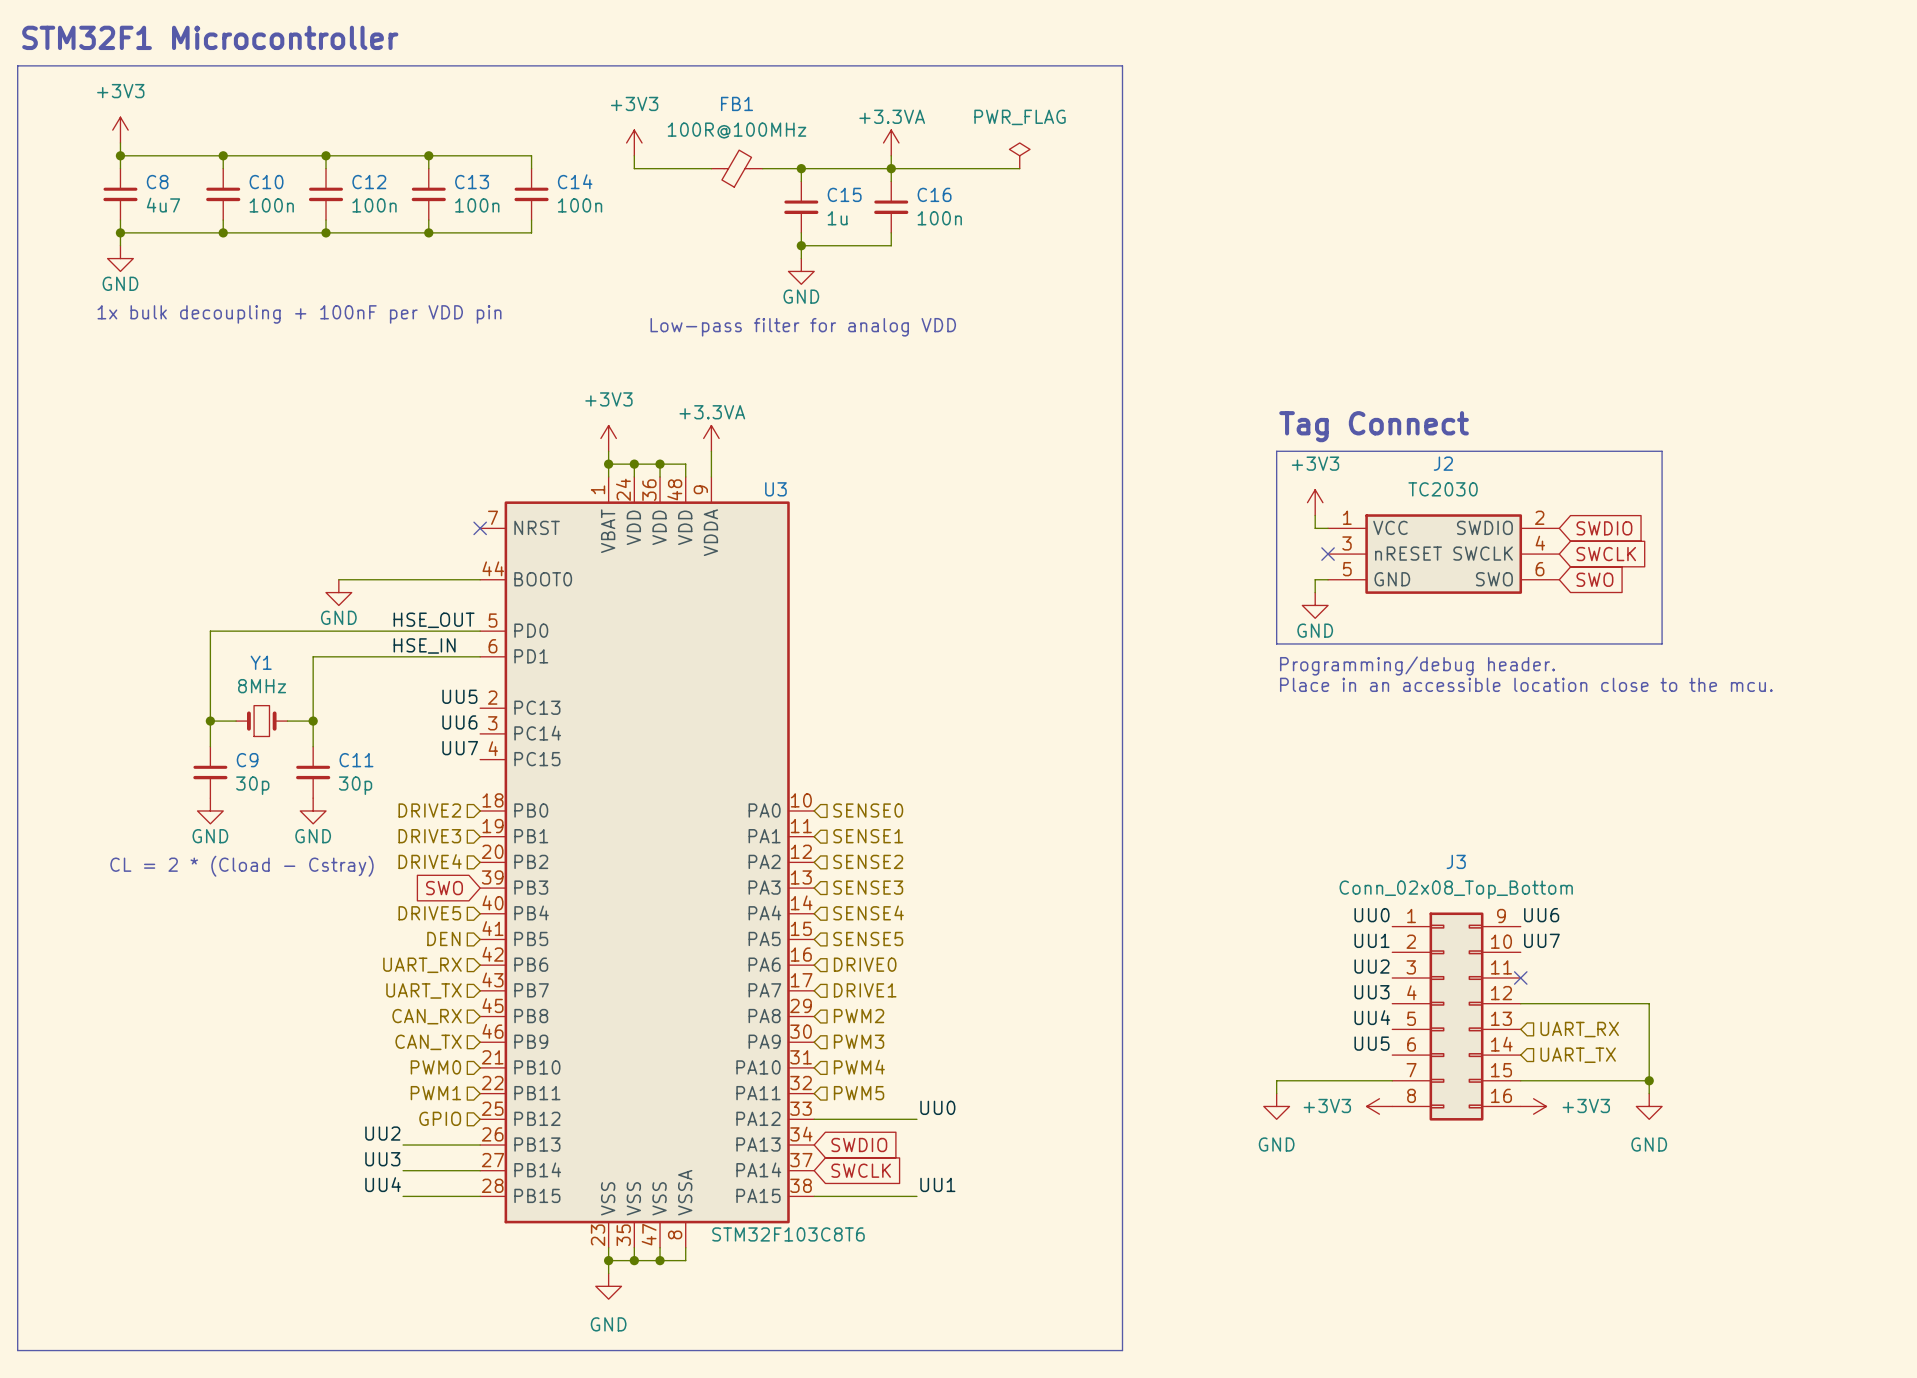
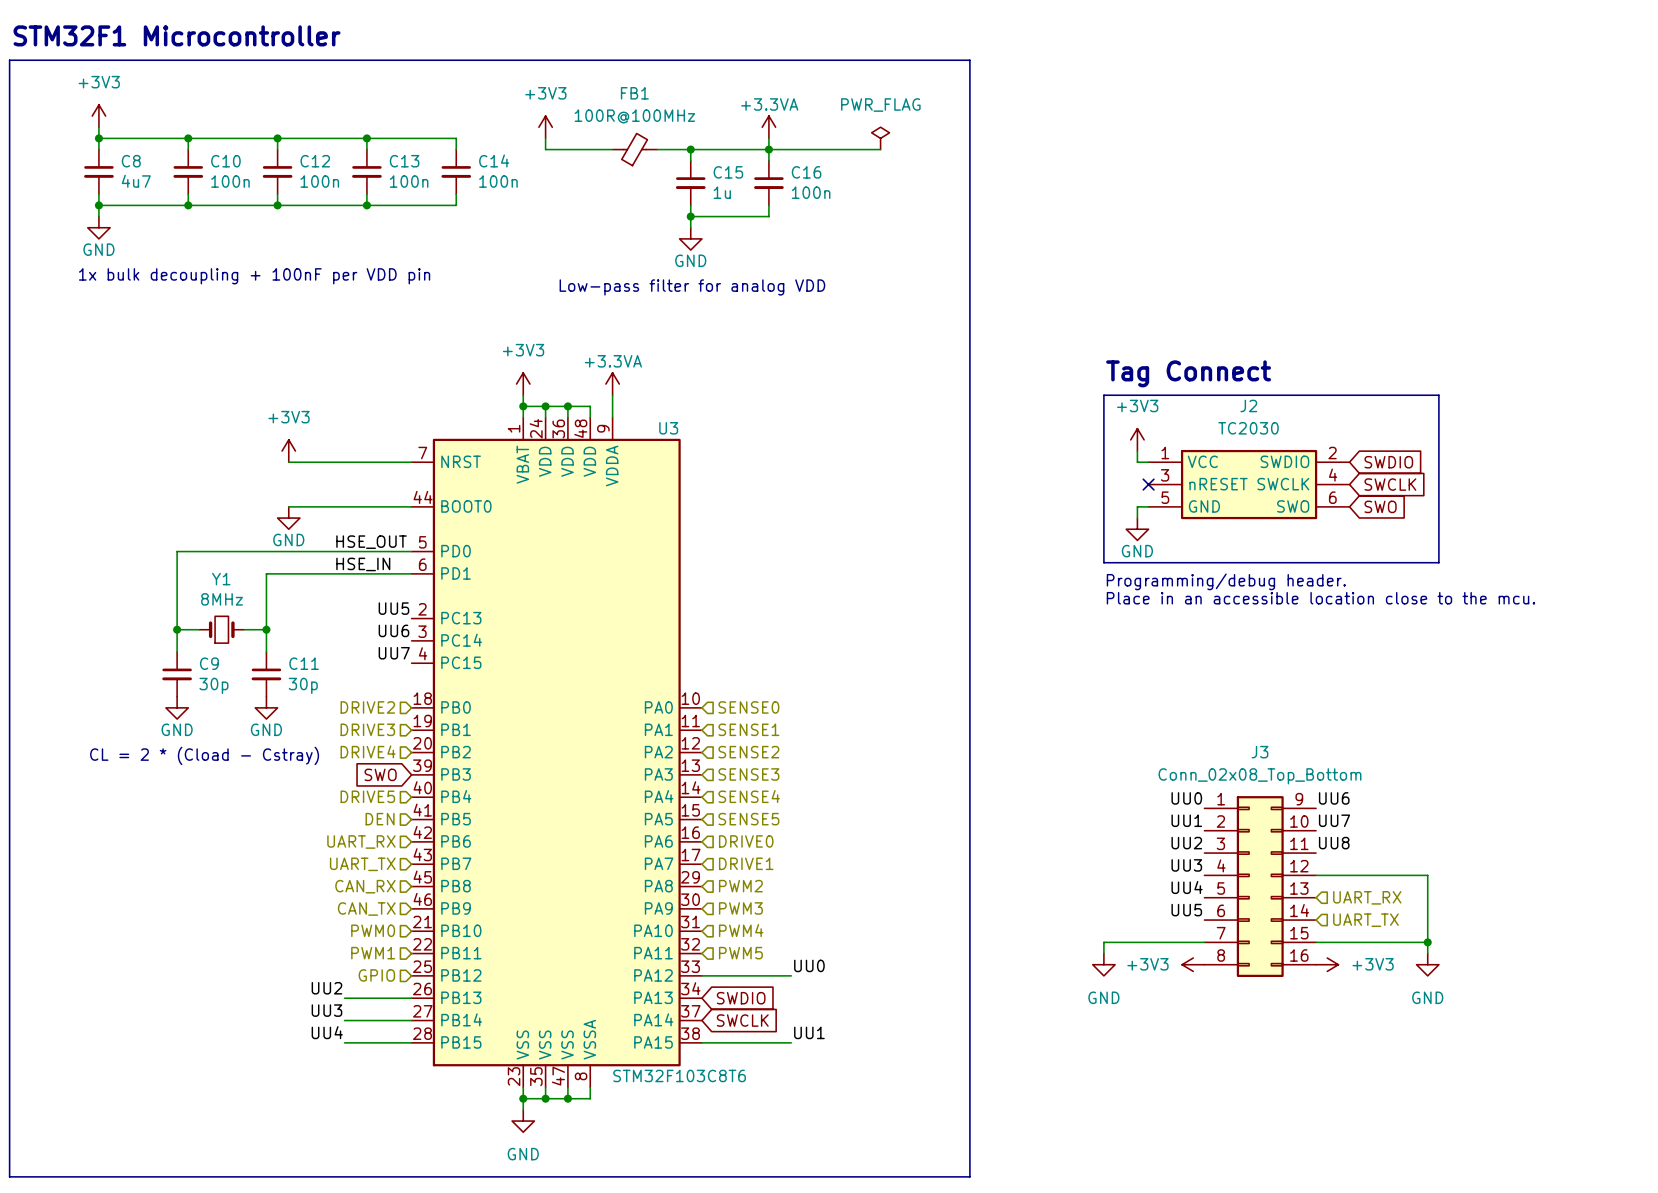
power symbol: none -> +3V3 (288, 451)
wire: none -> (288, 462) (411, 462)
no-connect mark: (480, 528) -> none
label: none -> UU8 (1334, 843)
no-connect mark: (1520, 977) -> none

